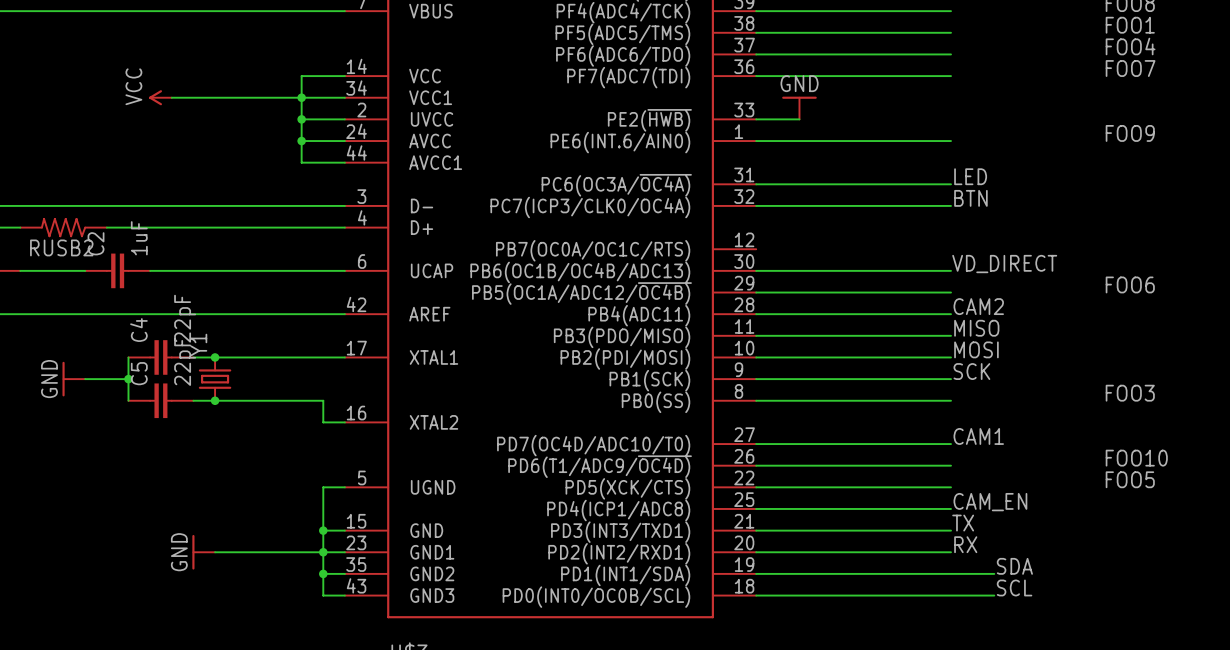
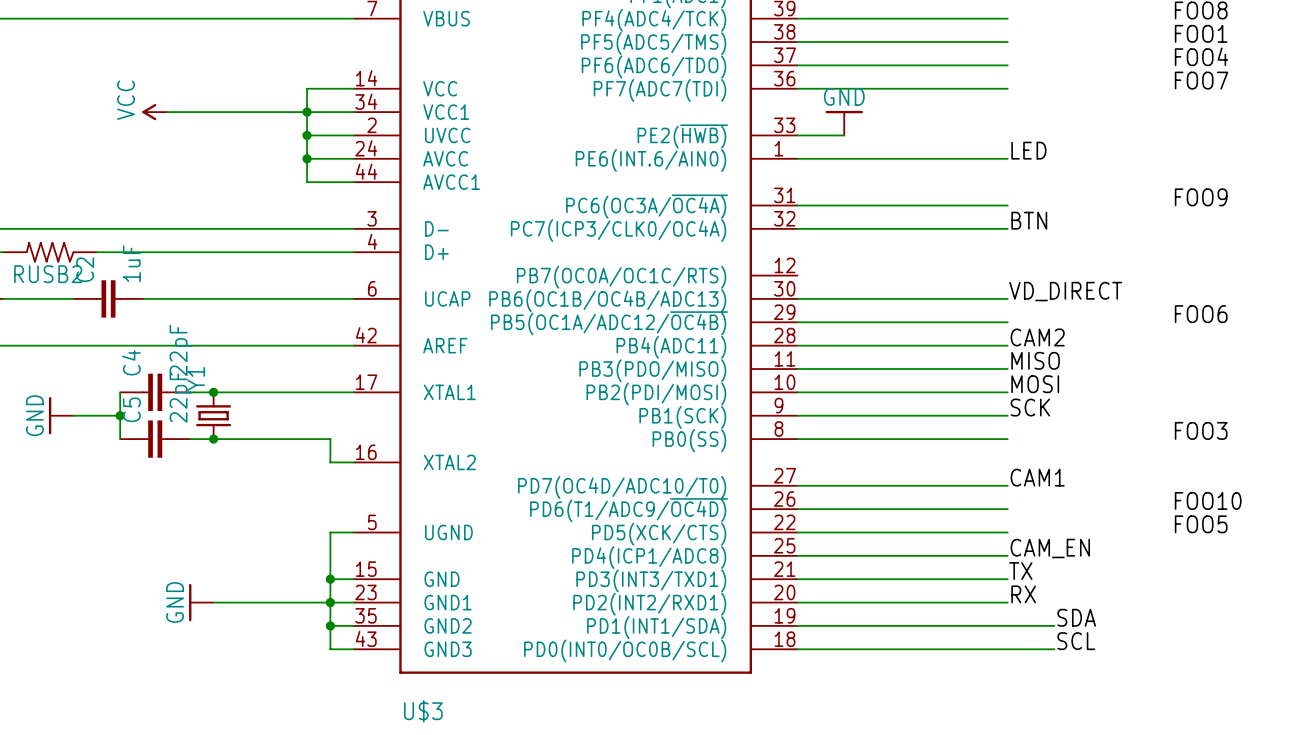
label position: FOO9 (1130, 133) -> FOO9 (1201, 197)
label position: LED (970, 176) -> LED (1028, 150)

